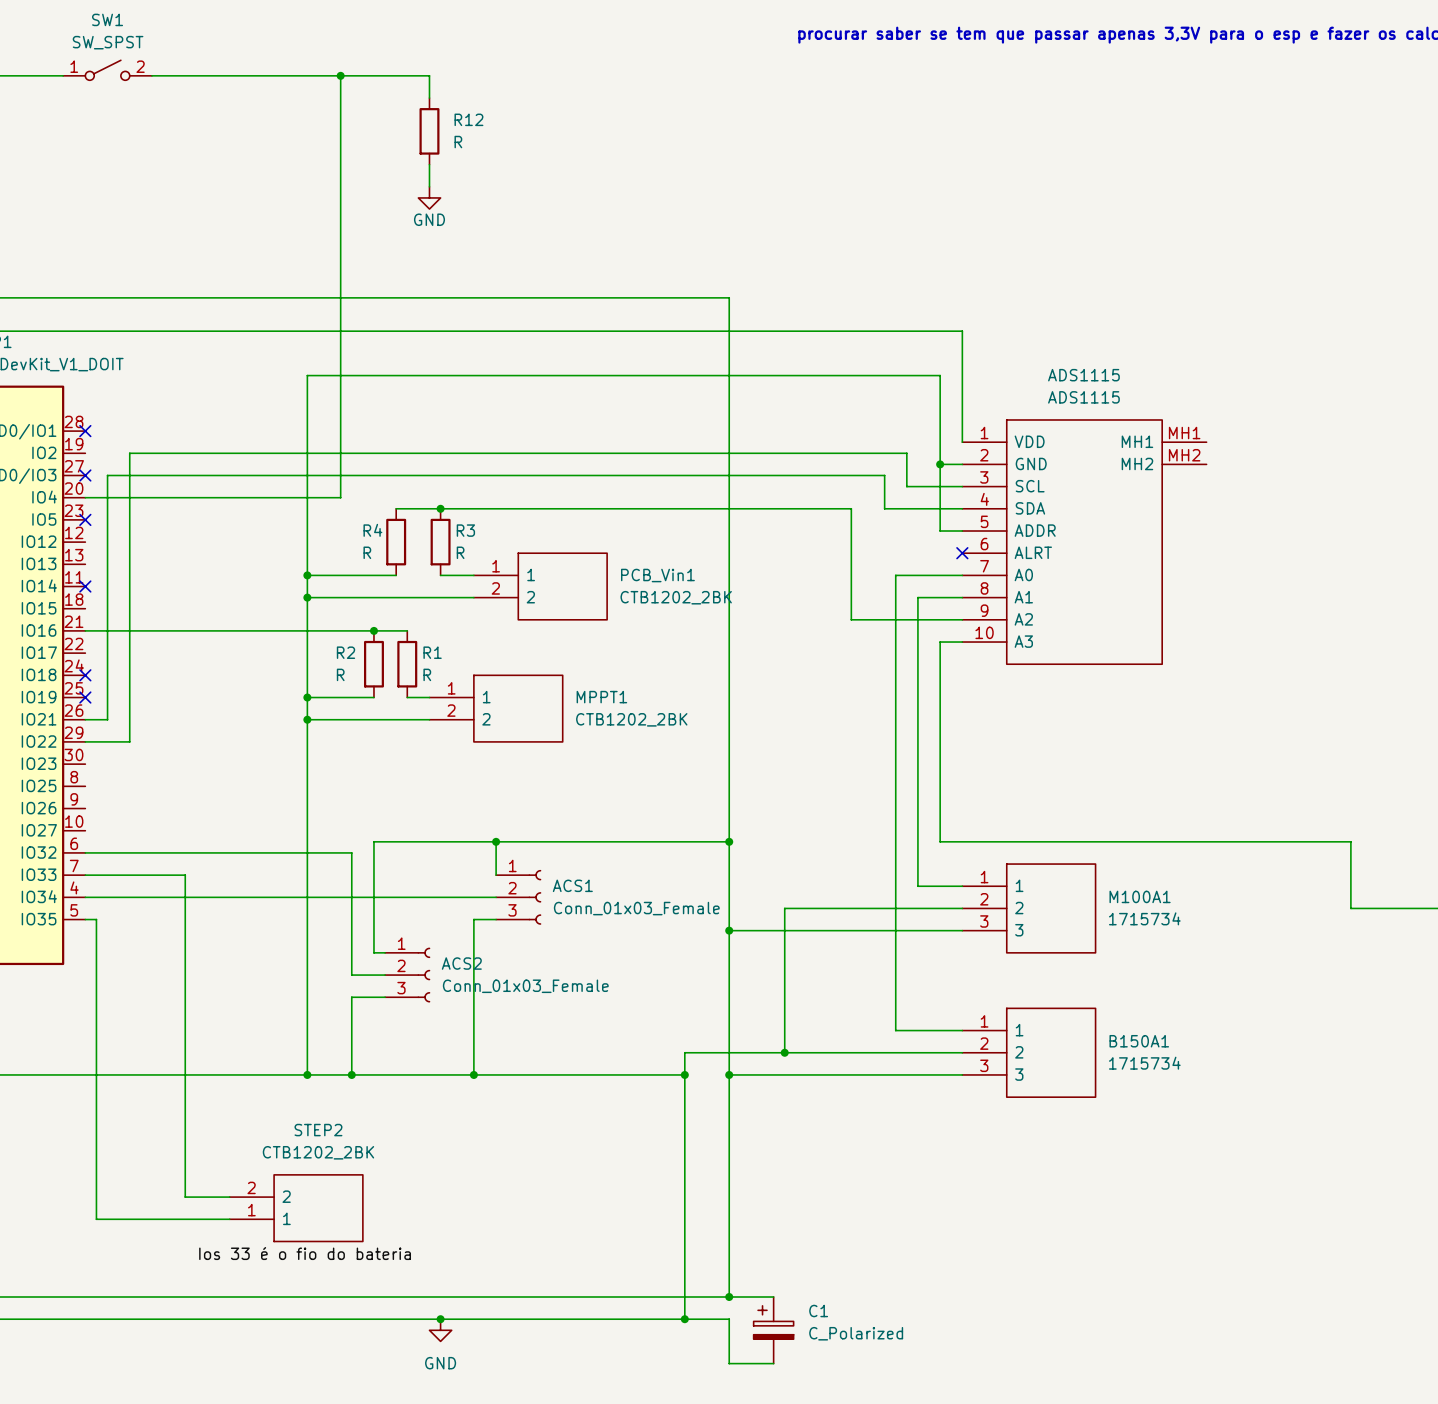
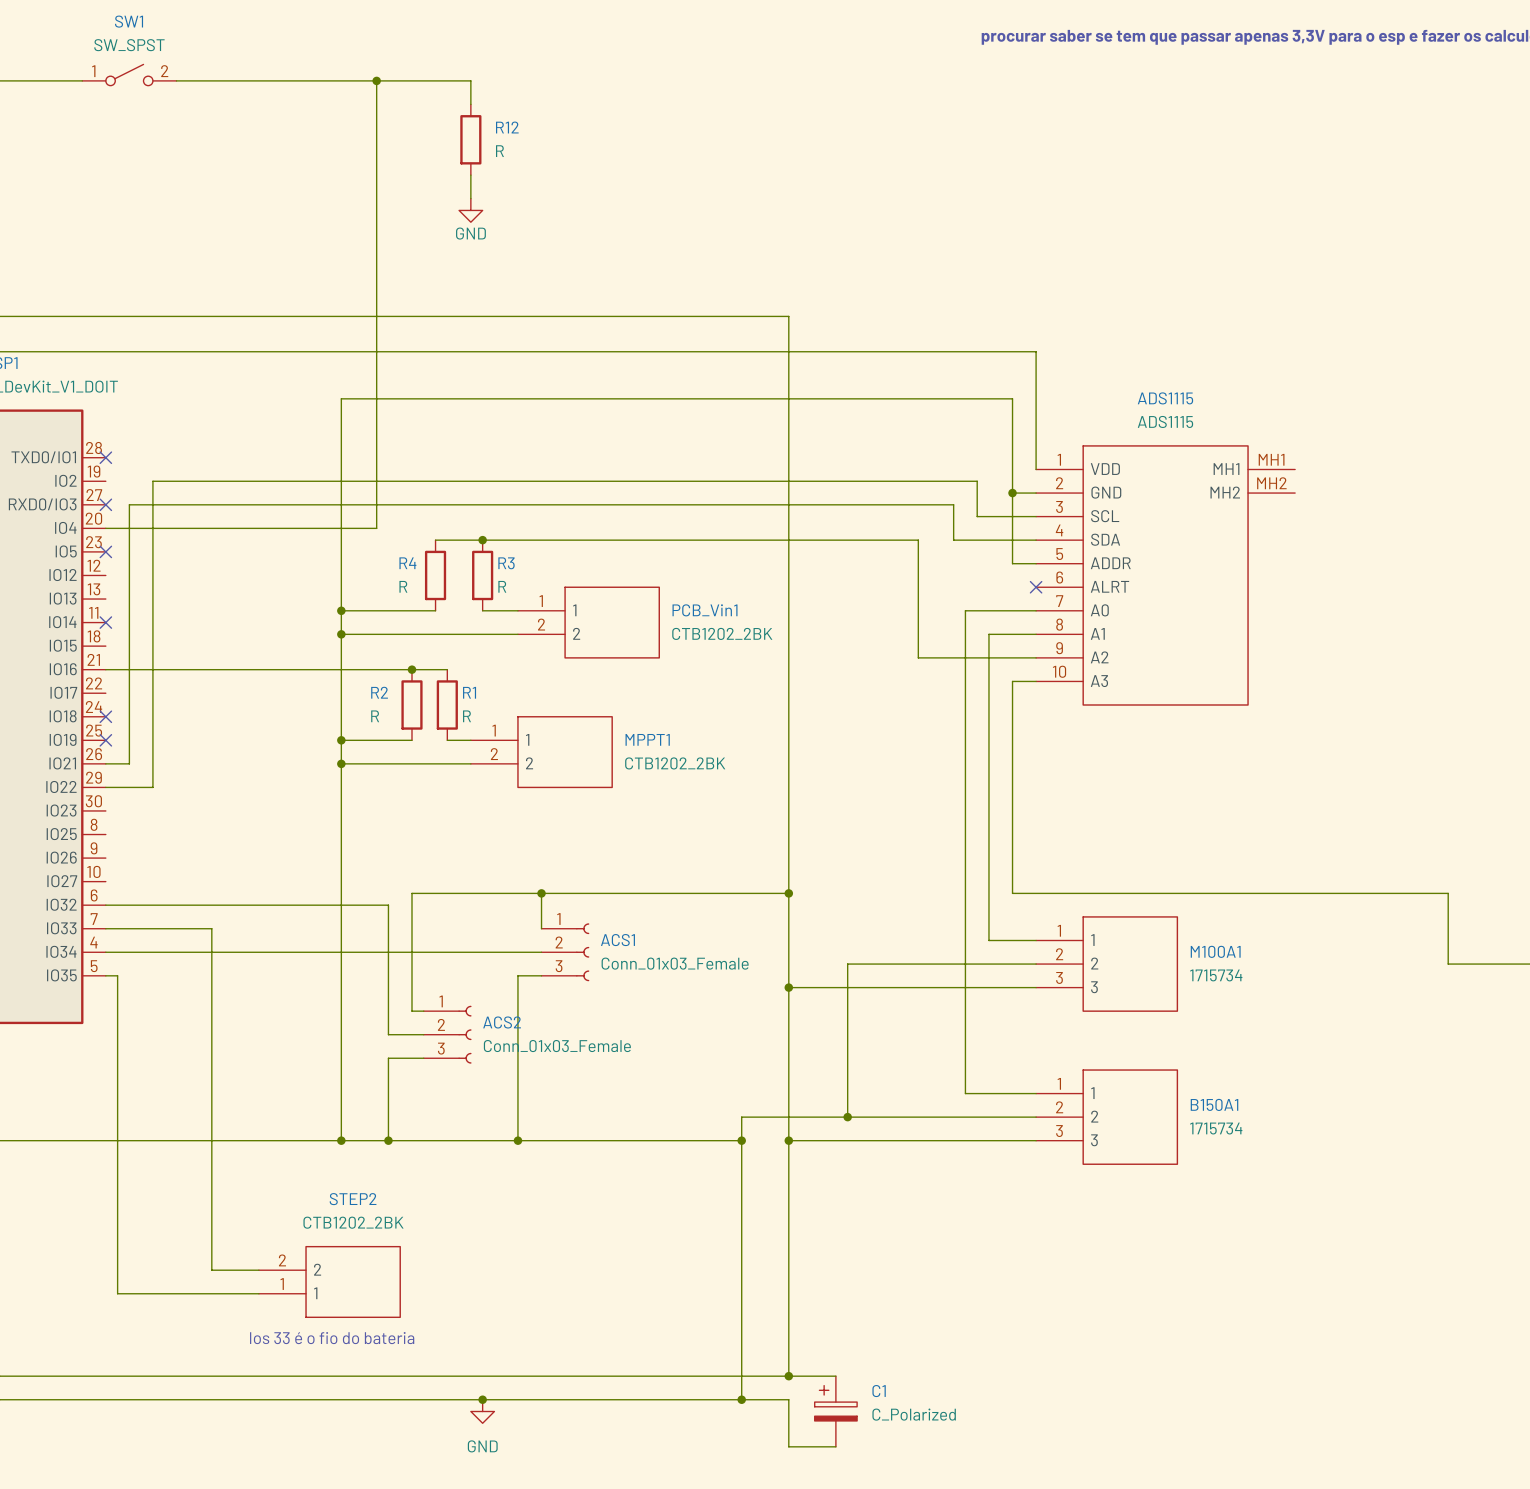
label: Ios 33 é o fio do bateria (305, 1253) -> none
text: none -> Ios 33 é o fio do bateria (332, 1338)

